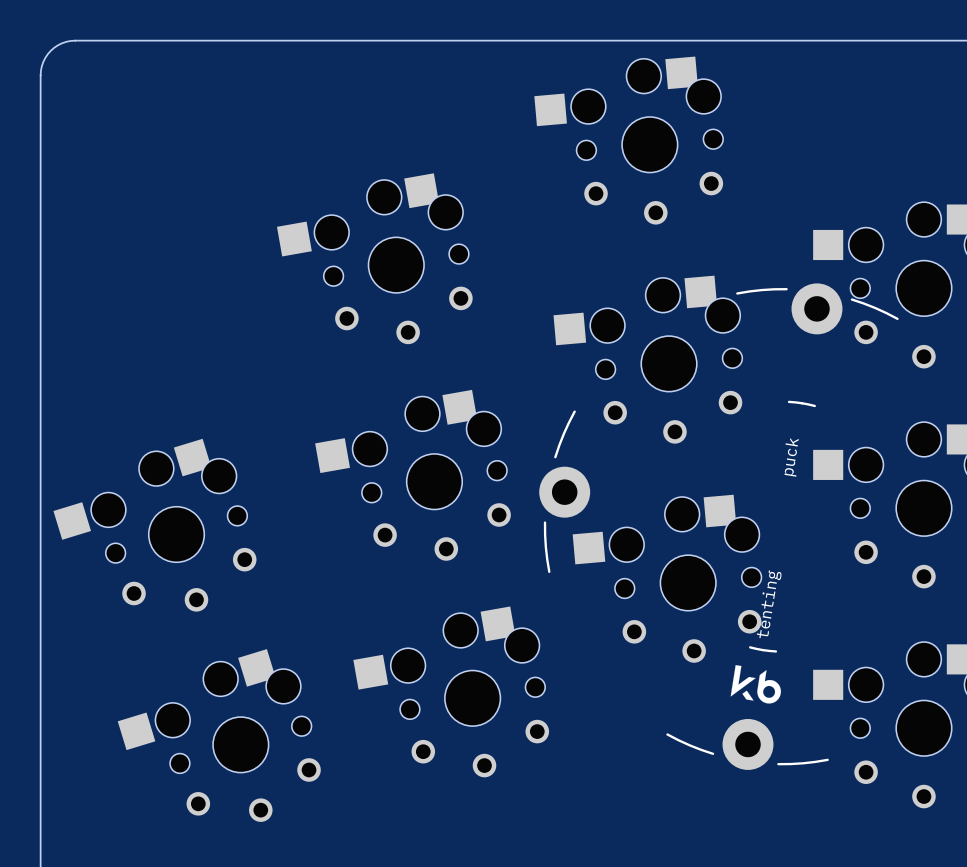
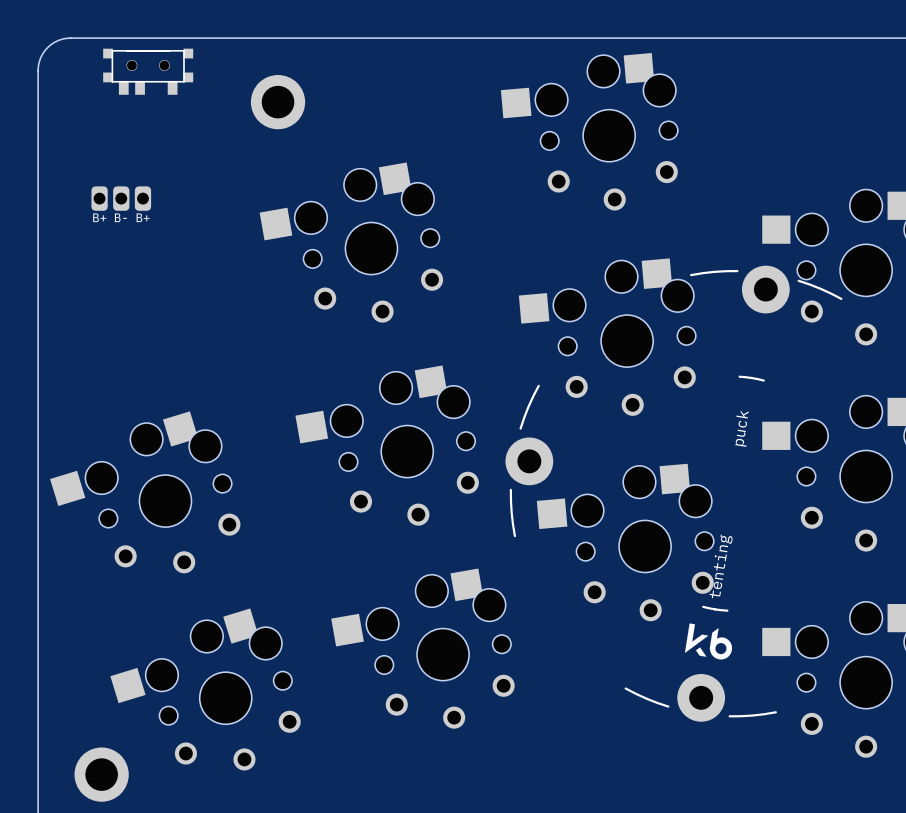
part: none -> (148, 65)
part: none -> (148, 71)
part: none -> (278, 102)
part: none -> (121, 198)
part: none -> (101, 774)

